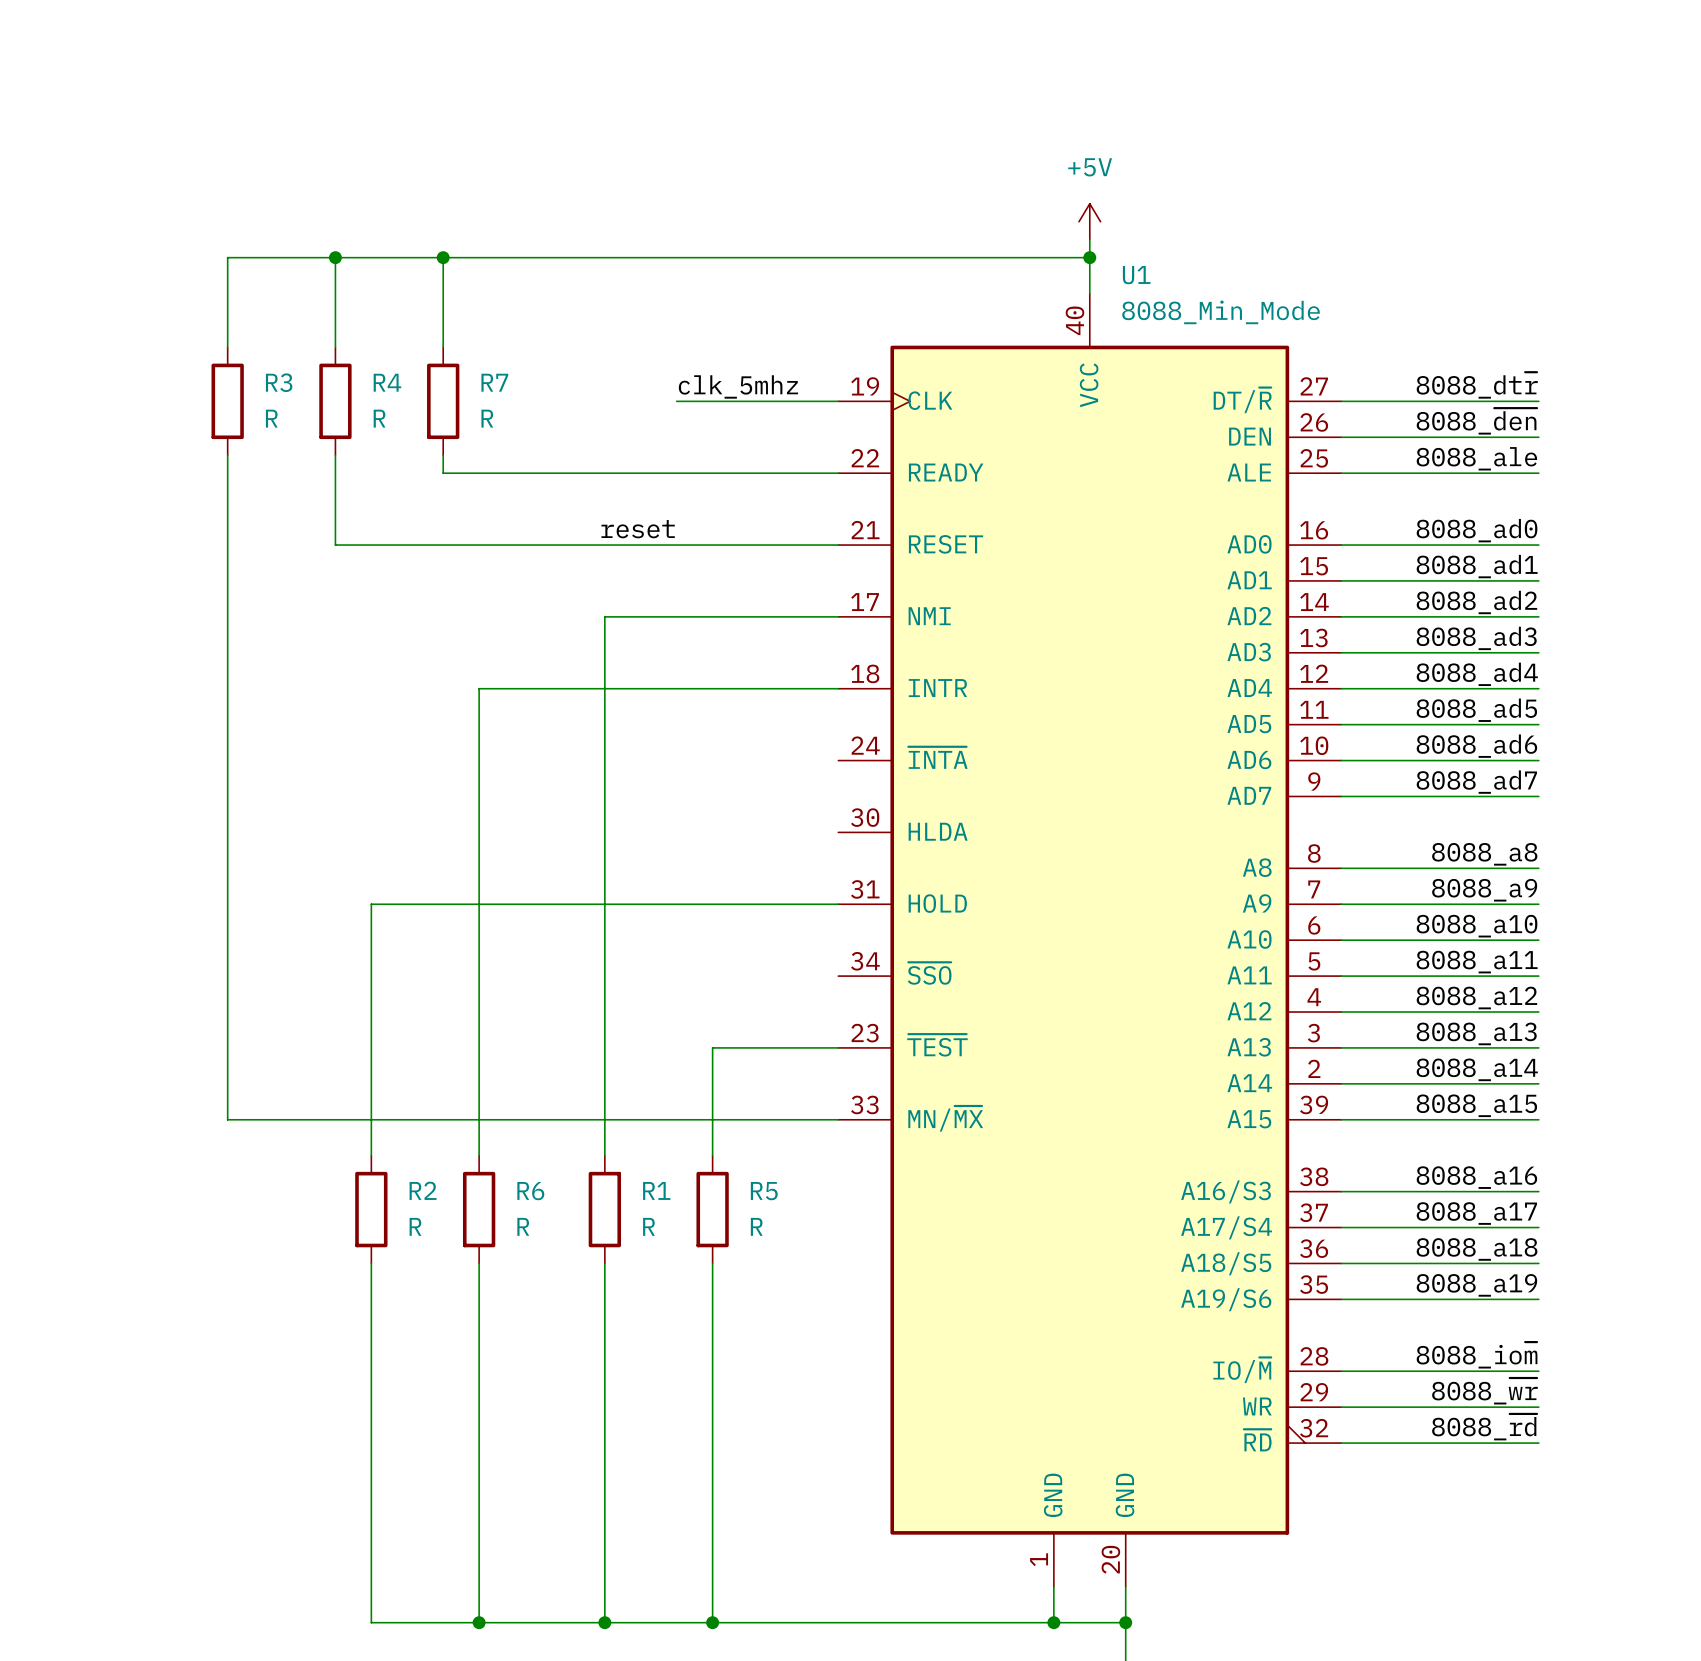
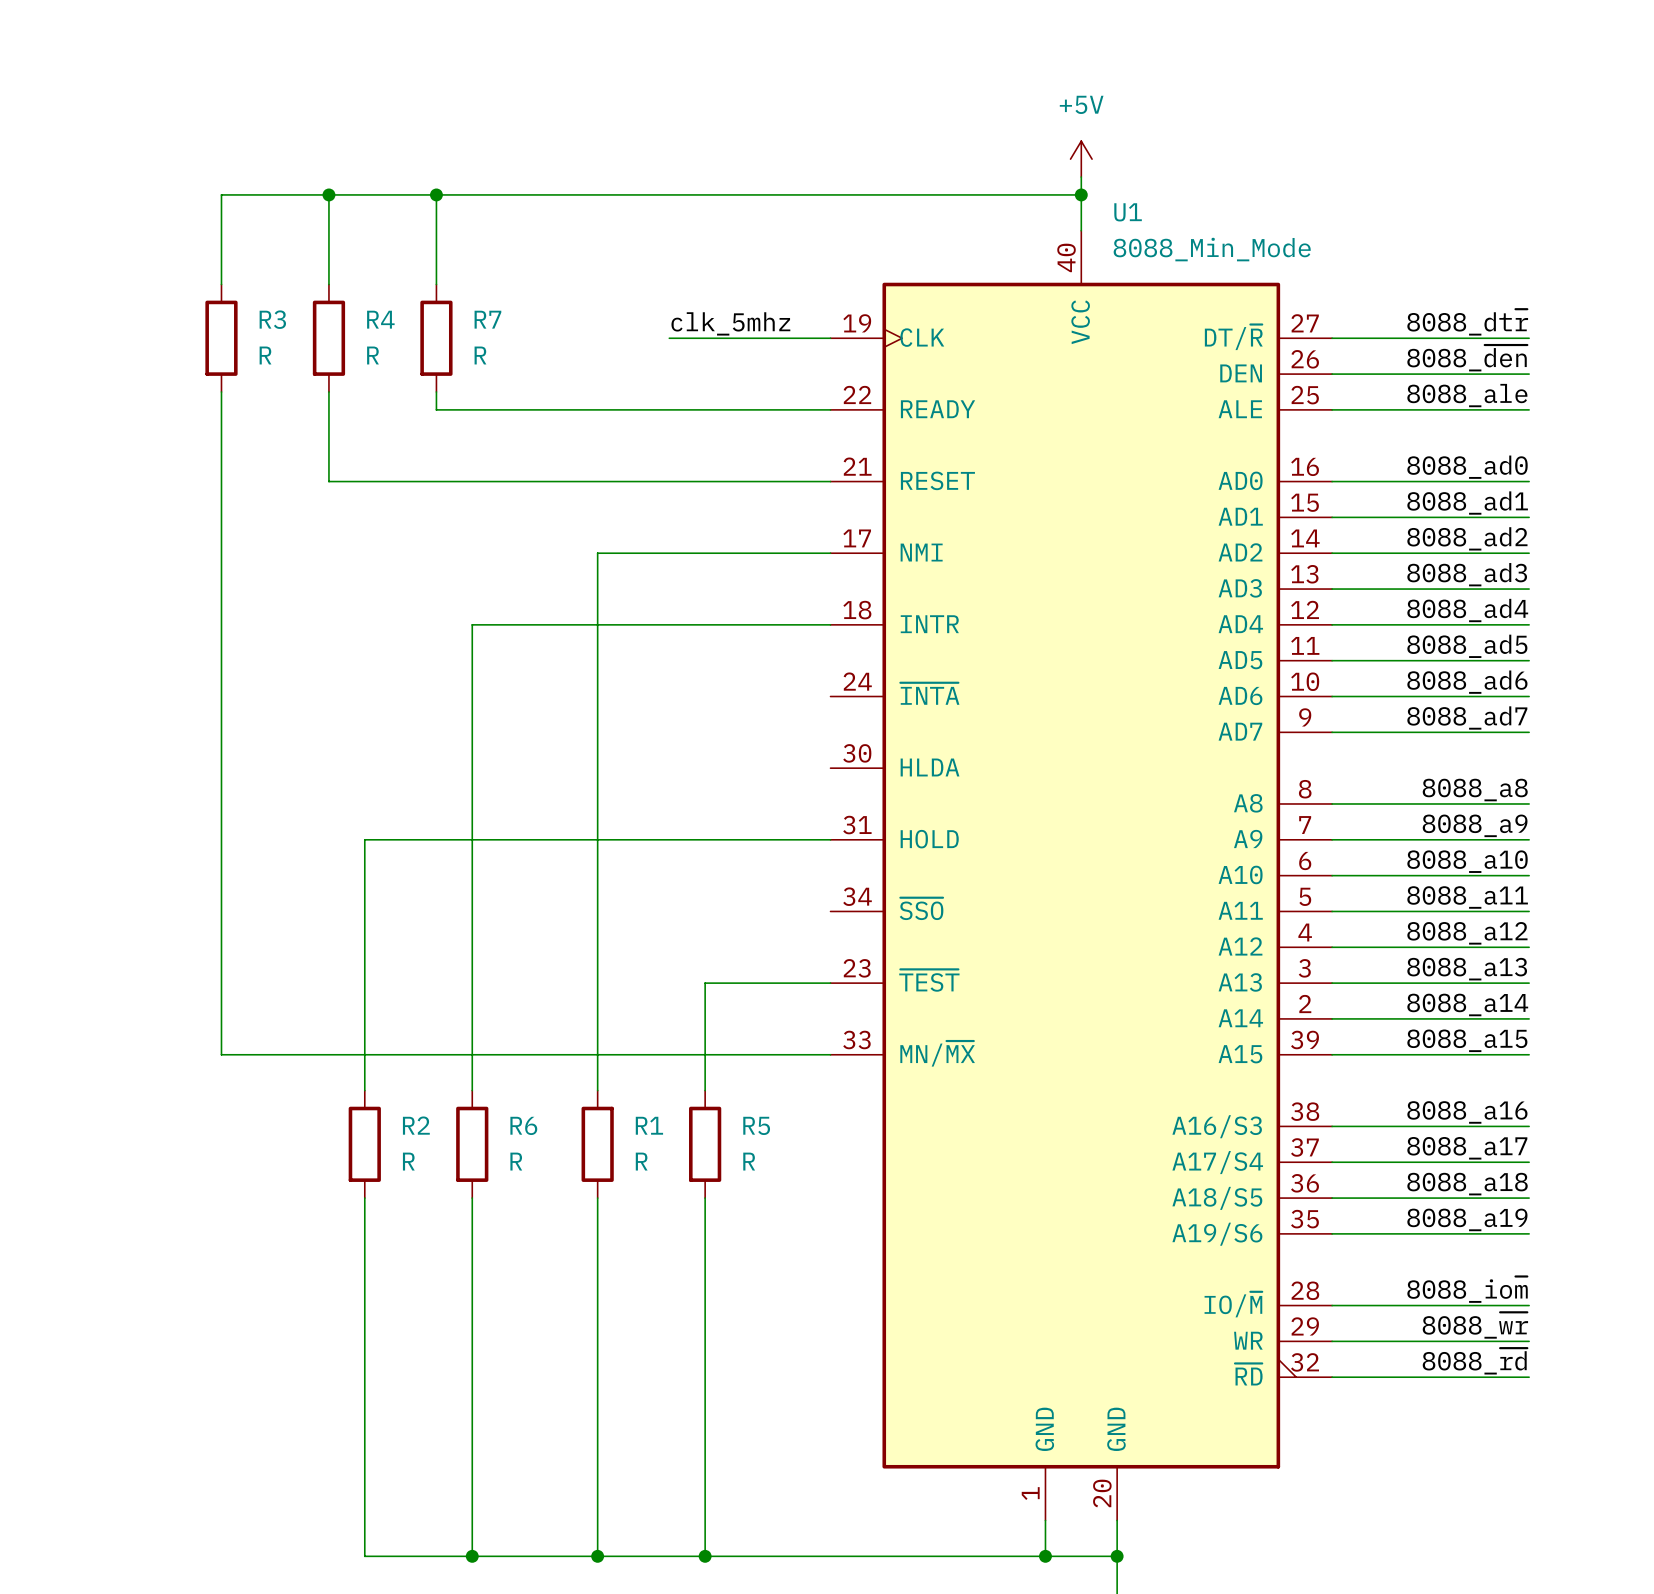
label: reset (638, 529) -> none

